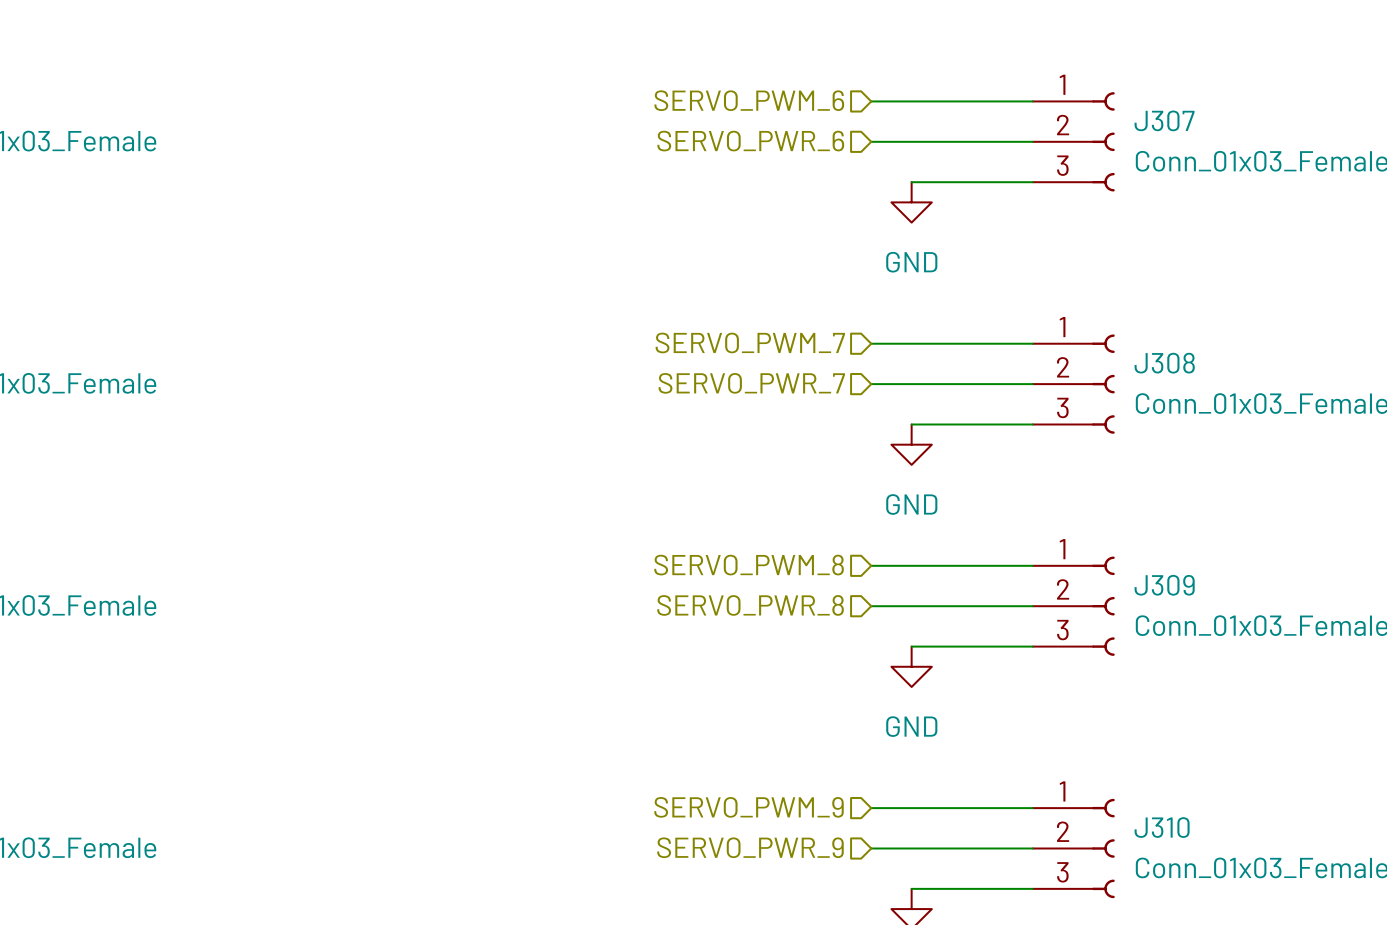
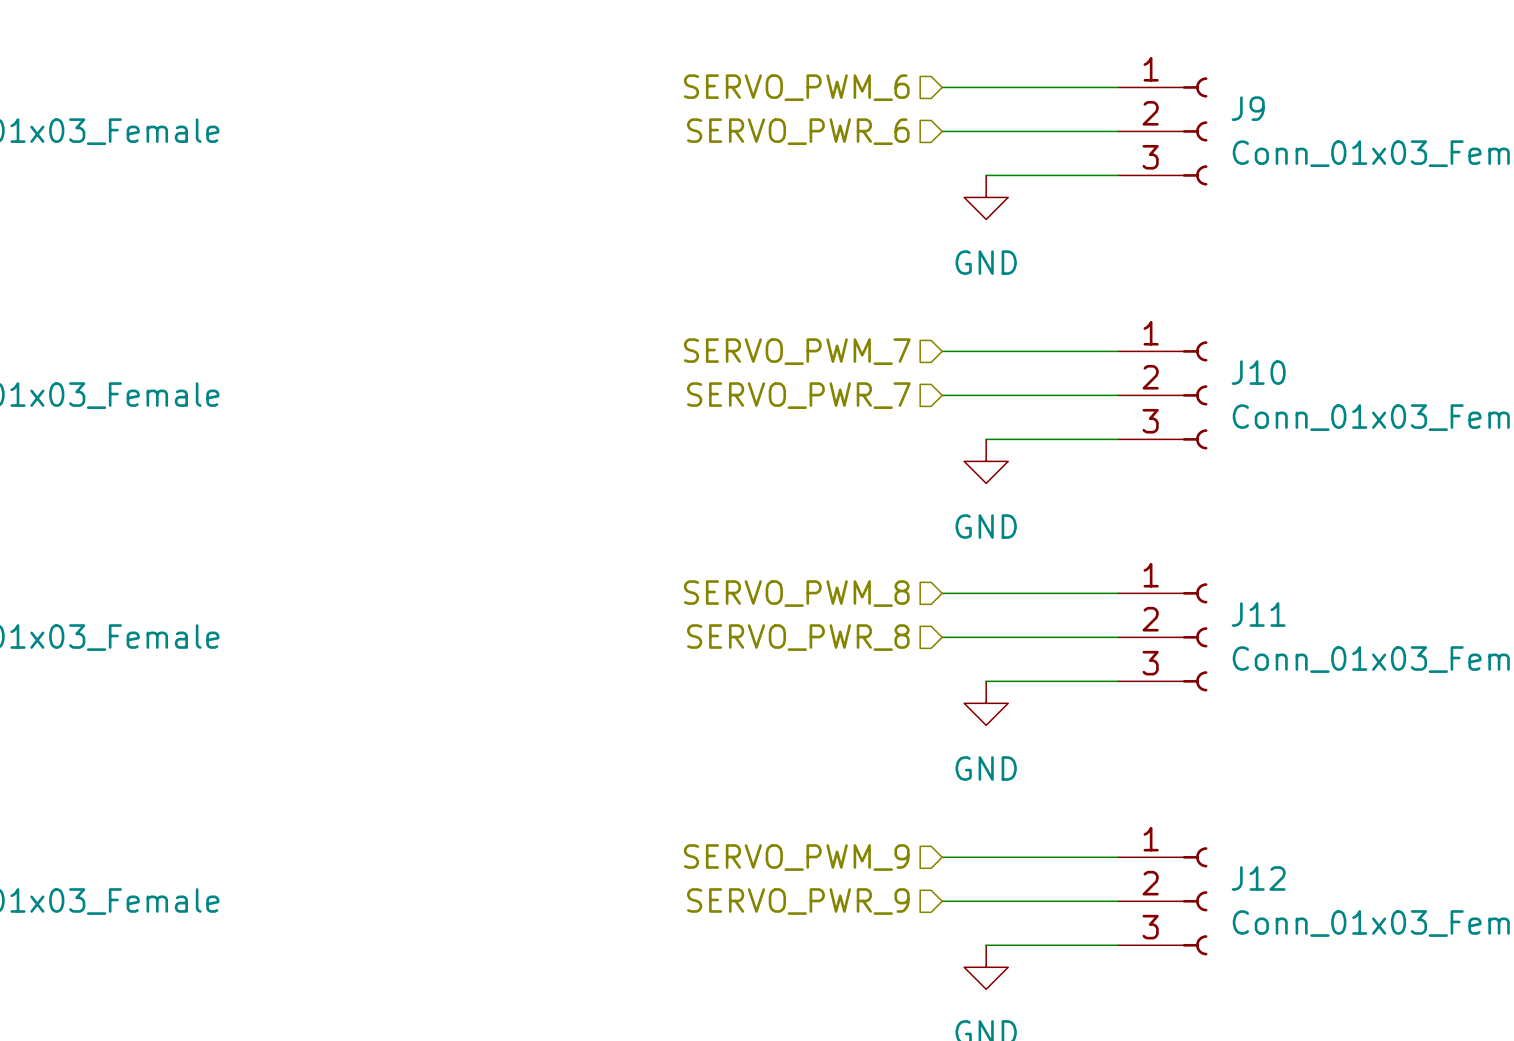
J307 name: J307 (1164, 120) -> J9 (1248, 108)
J308 name: J308 (1164, 363) -> J10 (1258, 372)
J309 name: J309 (1164, 585) -> J11 (1258, 614)
J310 name: J310 (1162, 827) -> J12 (1258, 878)

